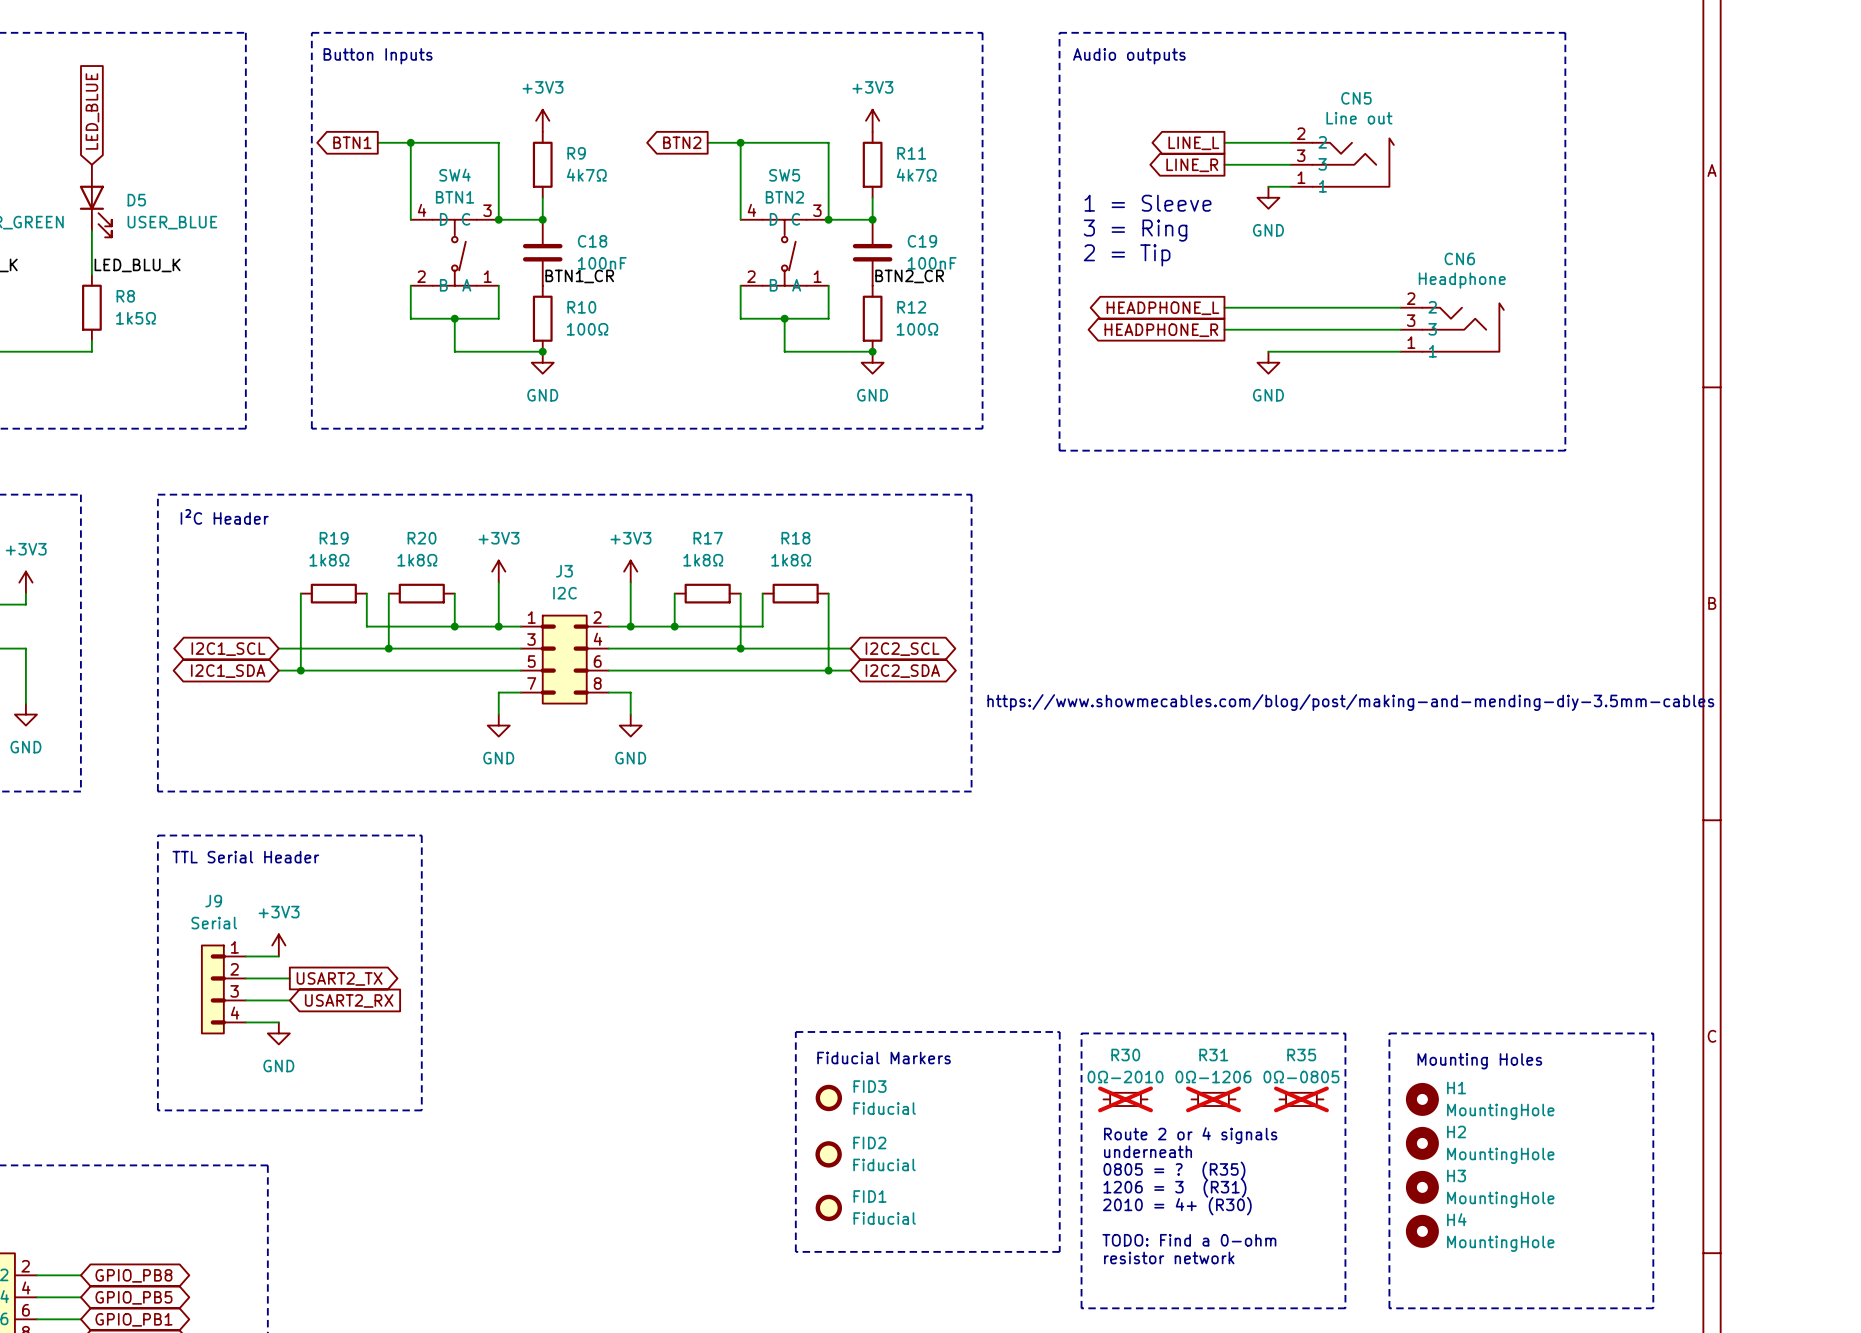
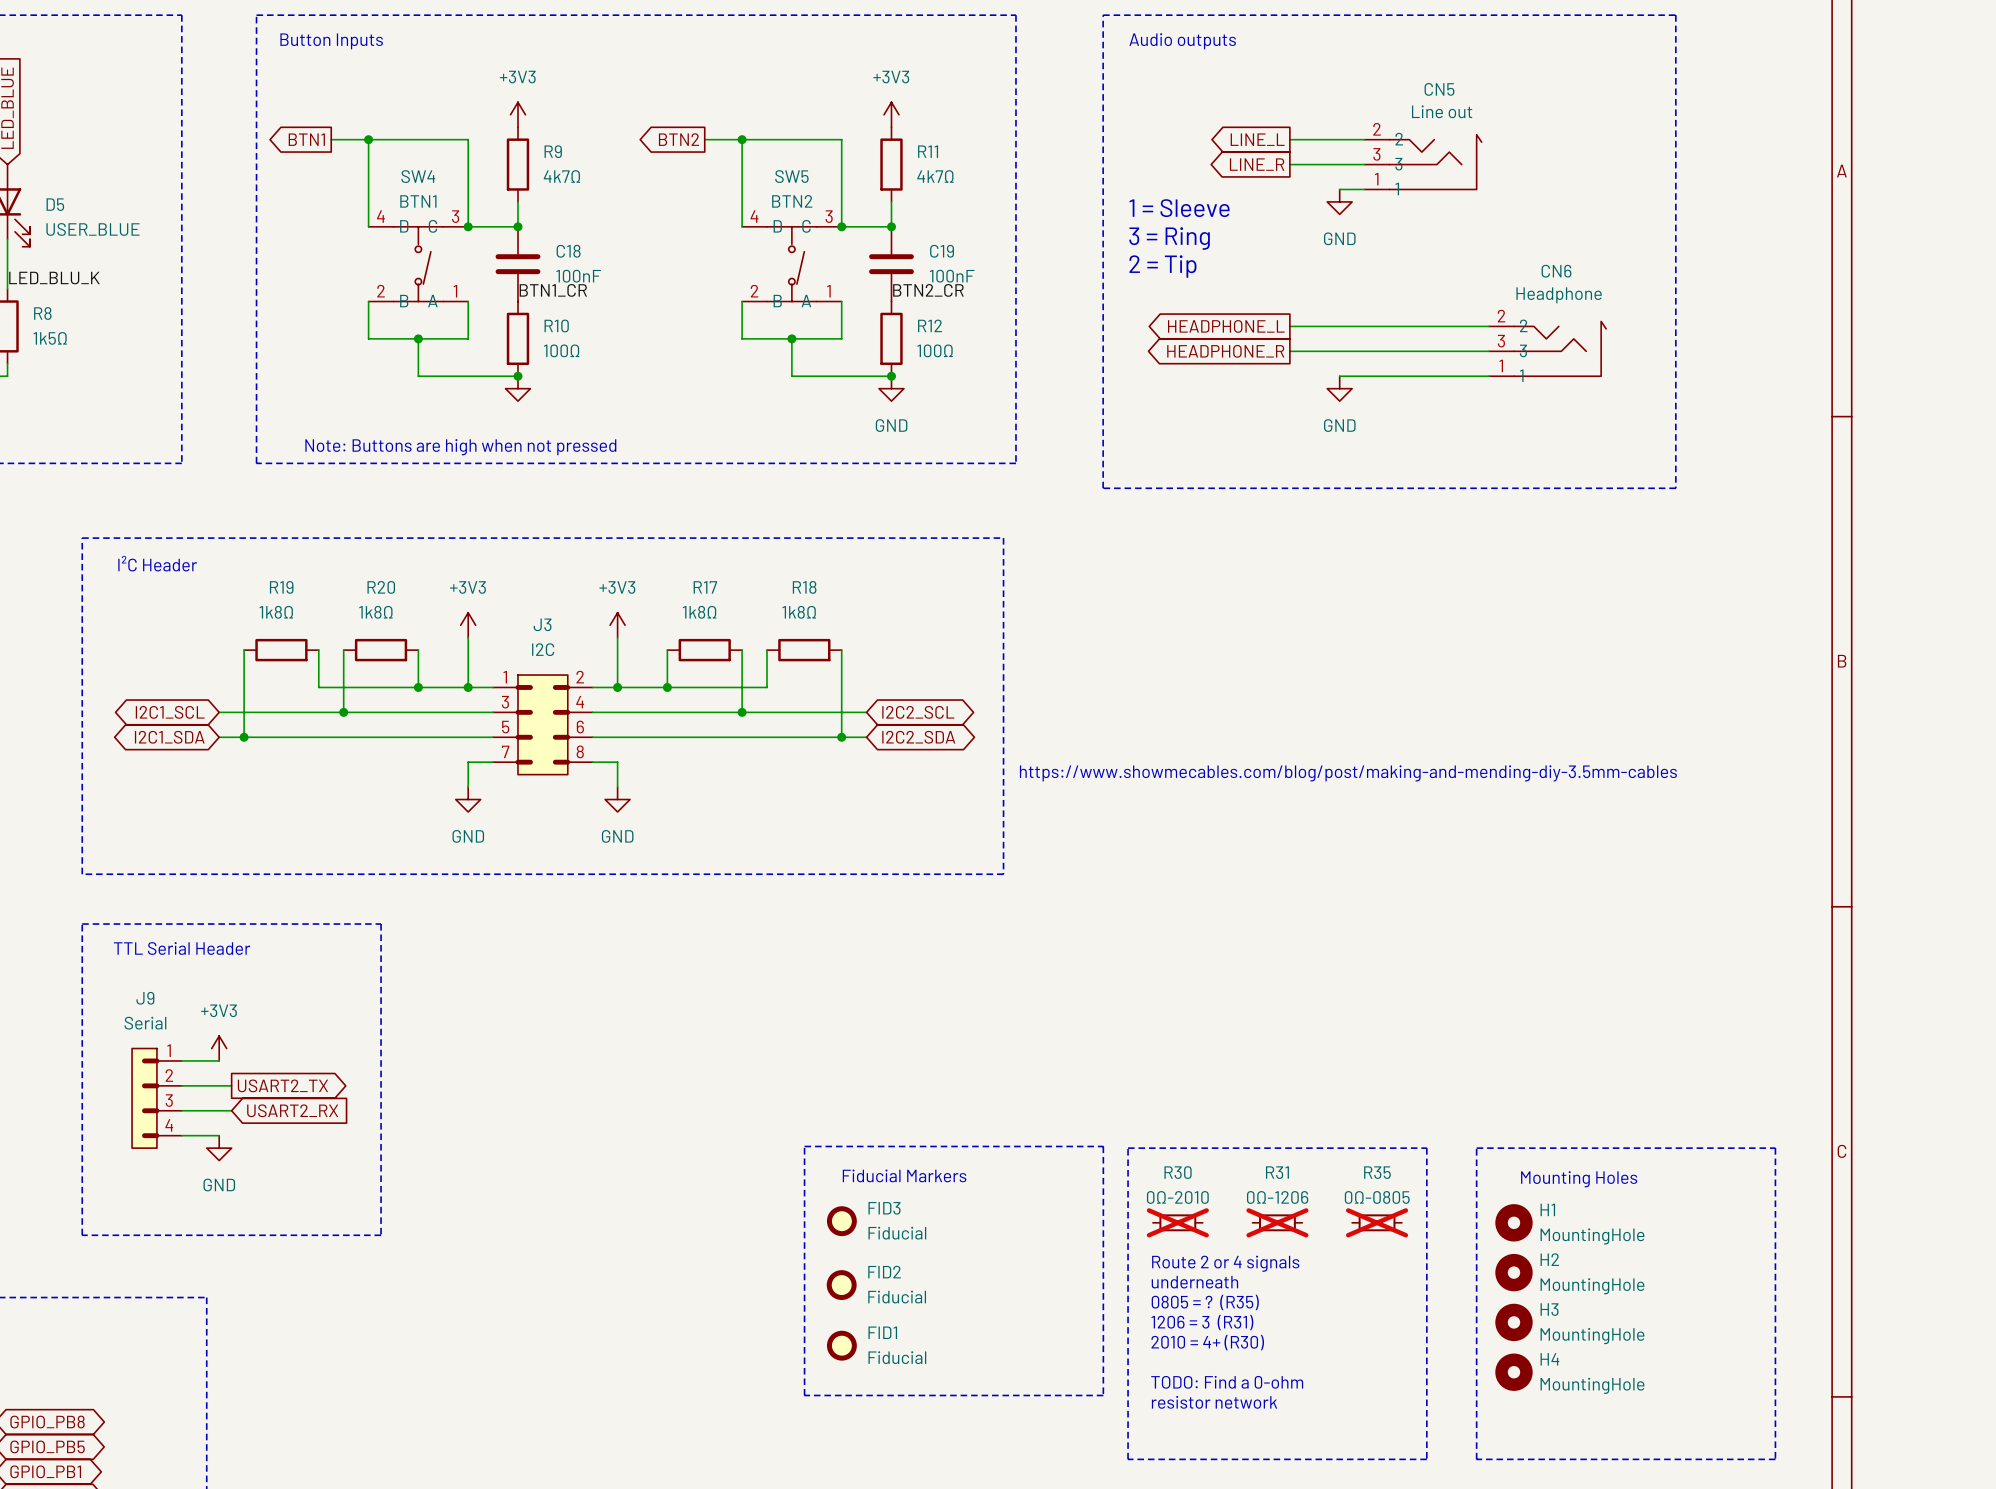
power symbol text: GND (542, 395) -> none
text: none -> Note: Buttons are high when not pressed (460, 447)

